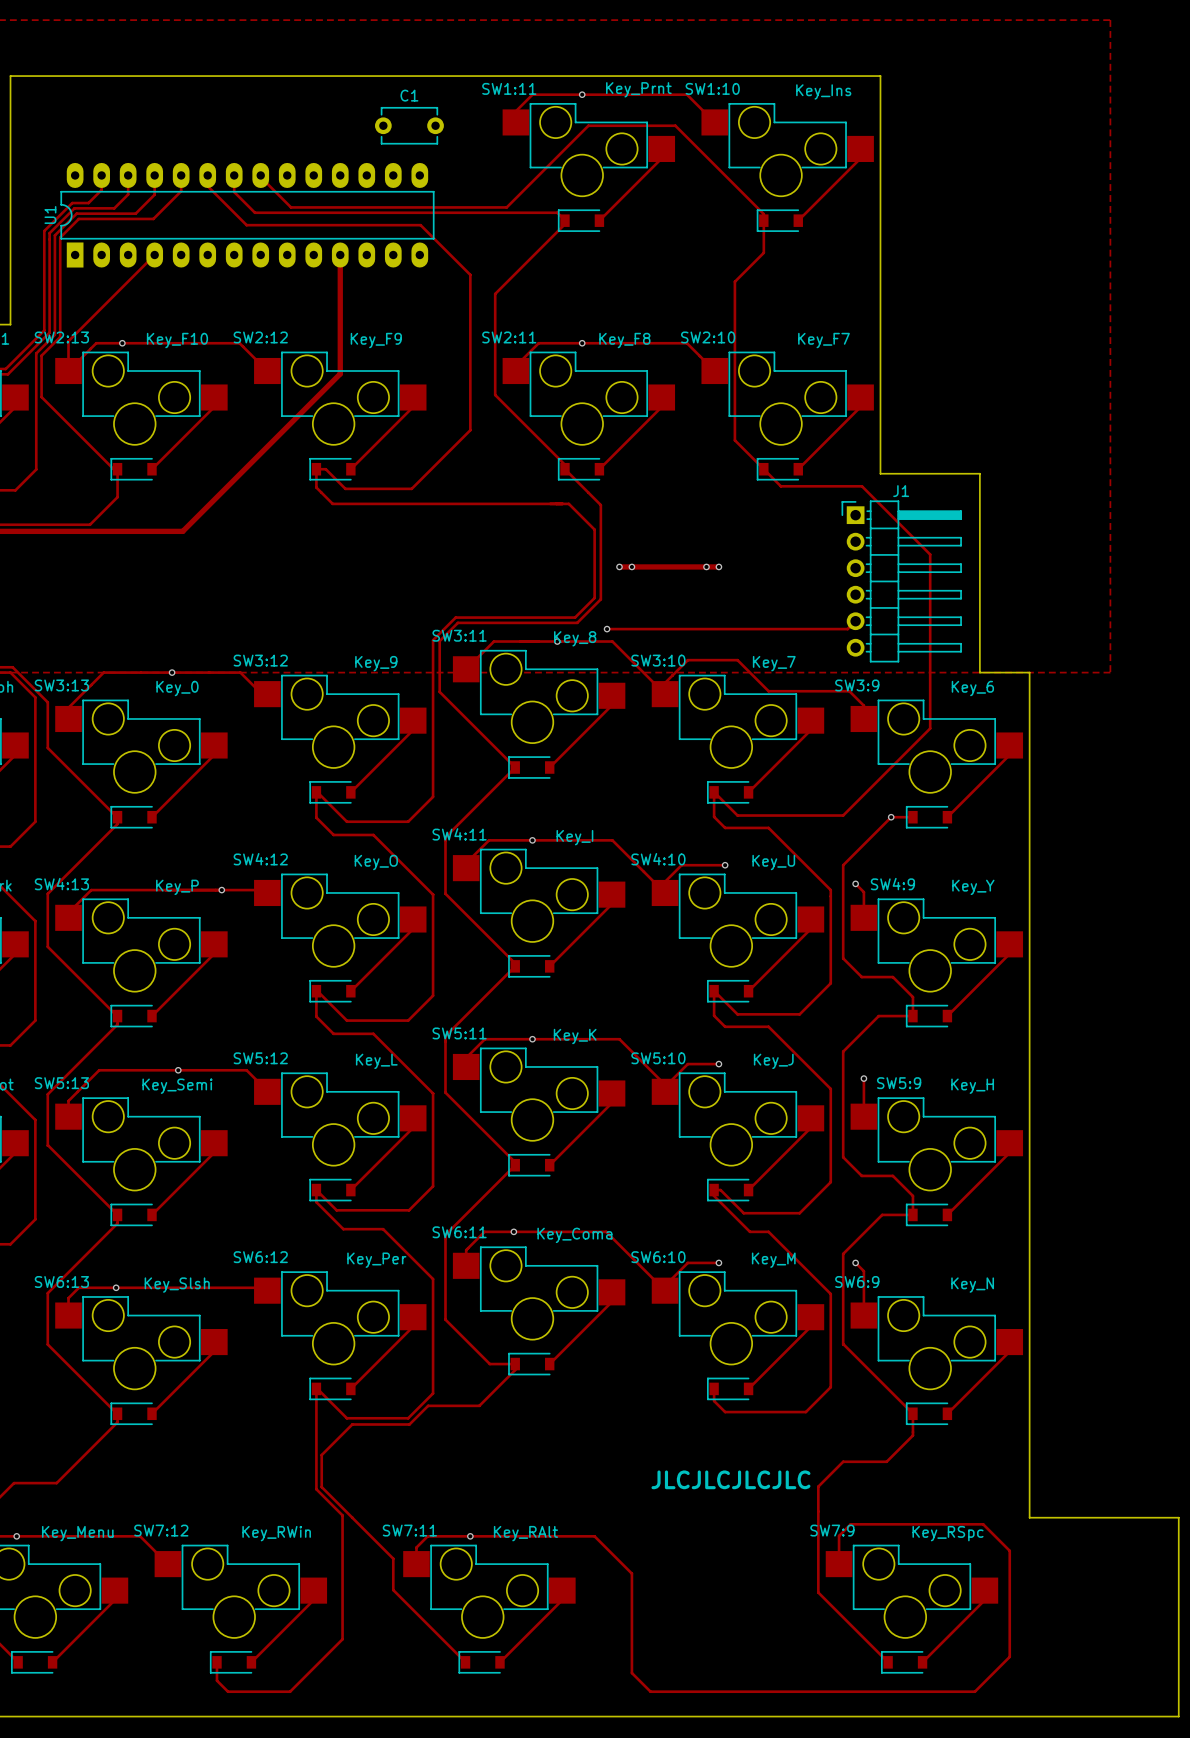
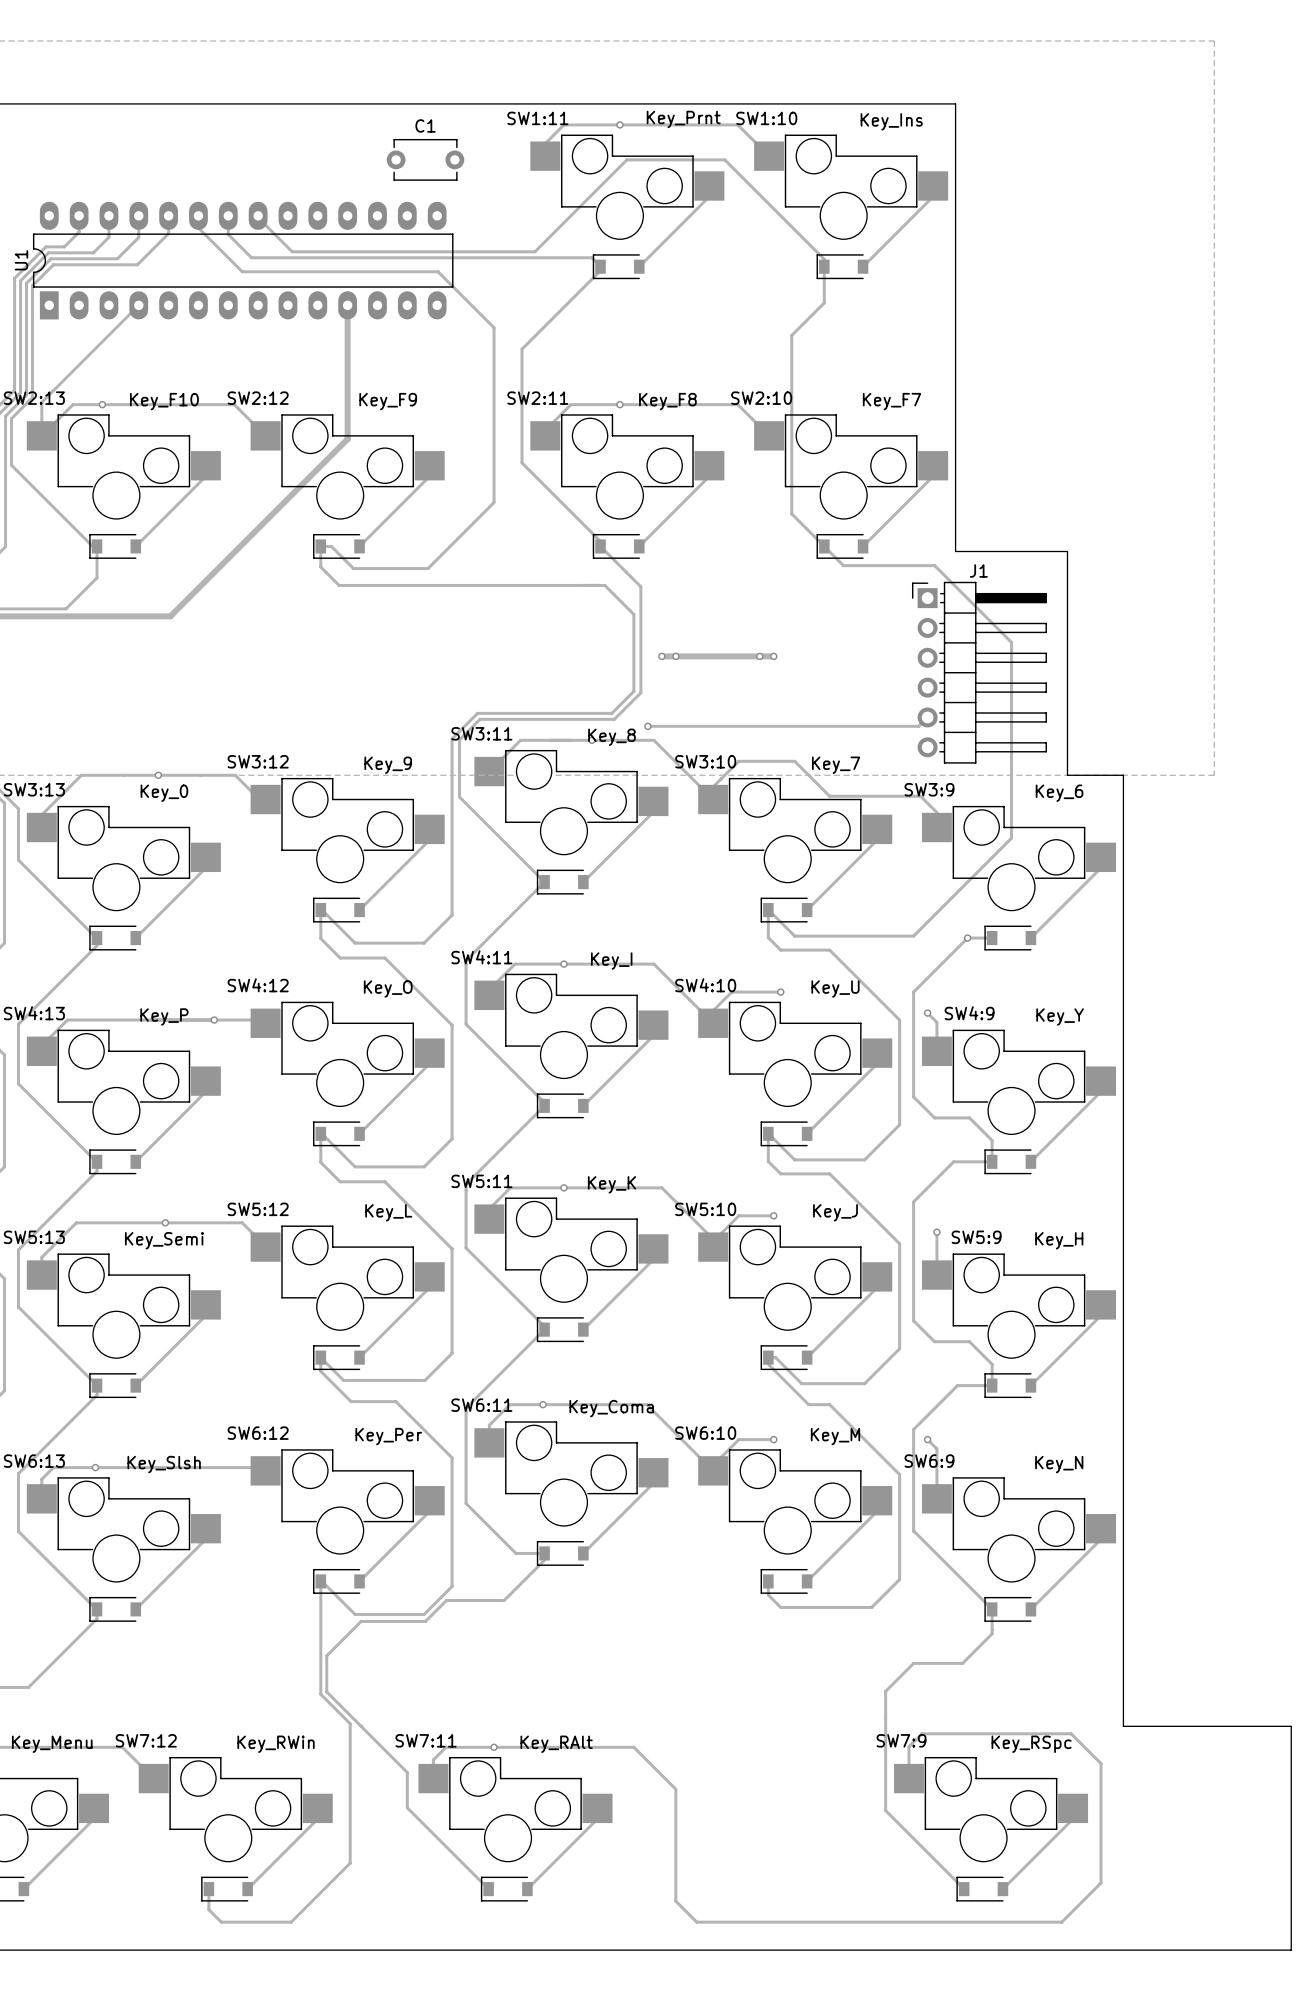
text: JLCJLCJLCJLC (730, 1479) -> none

